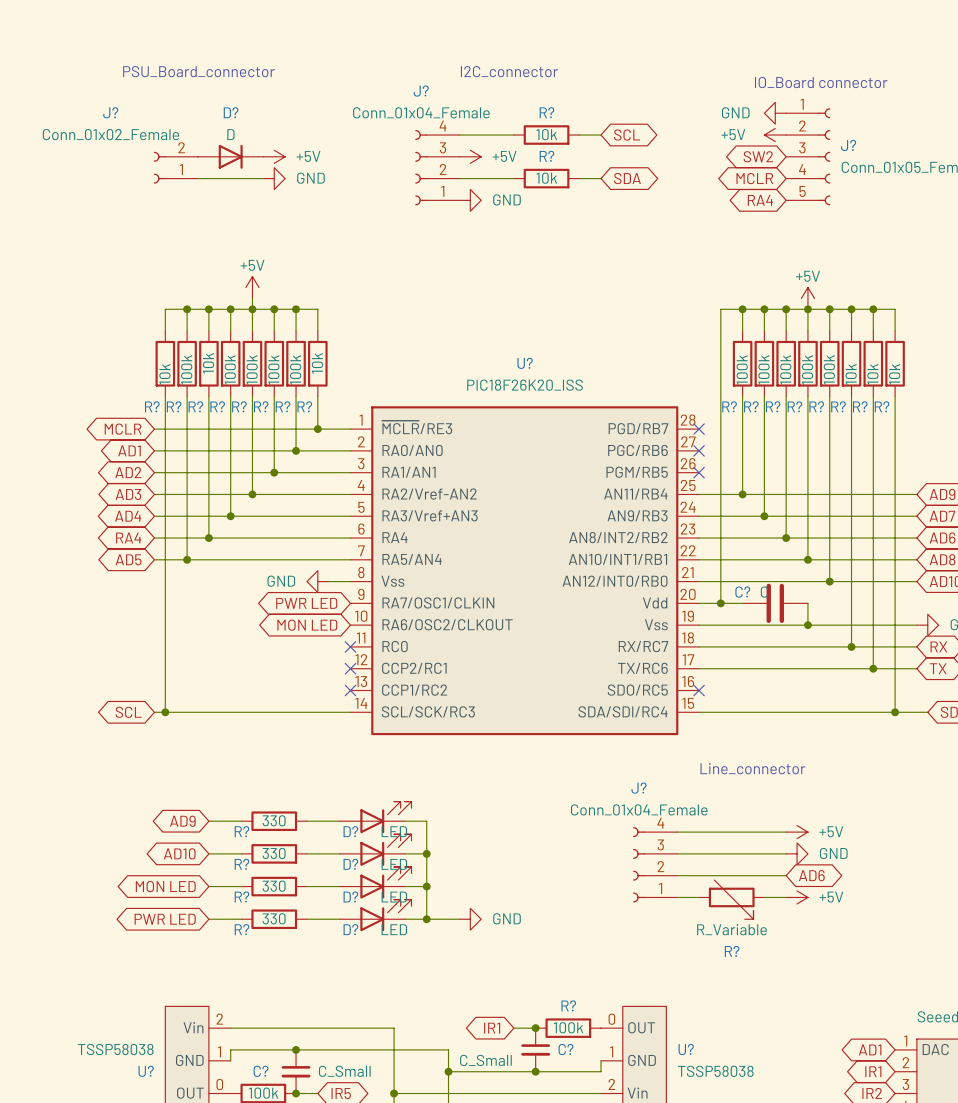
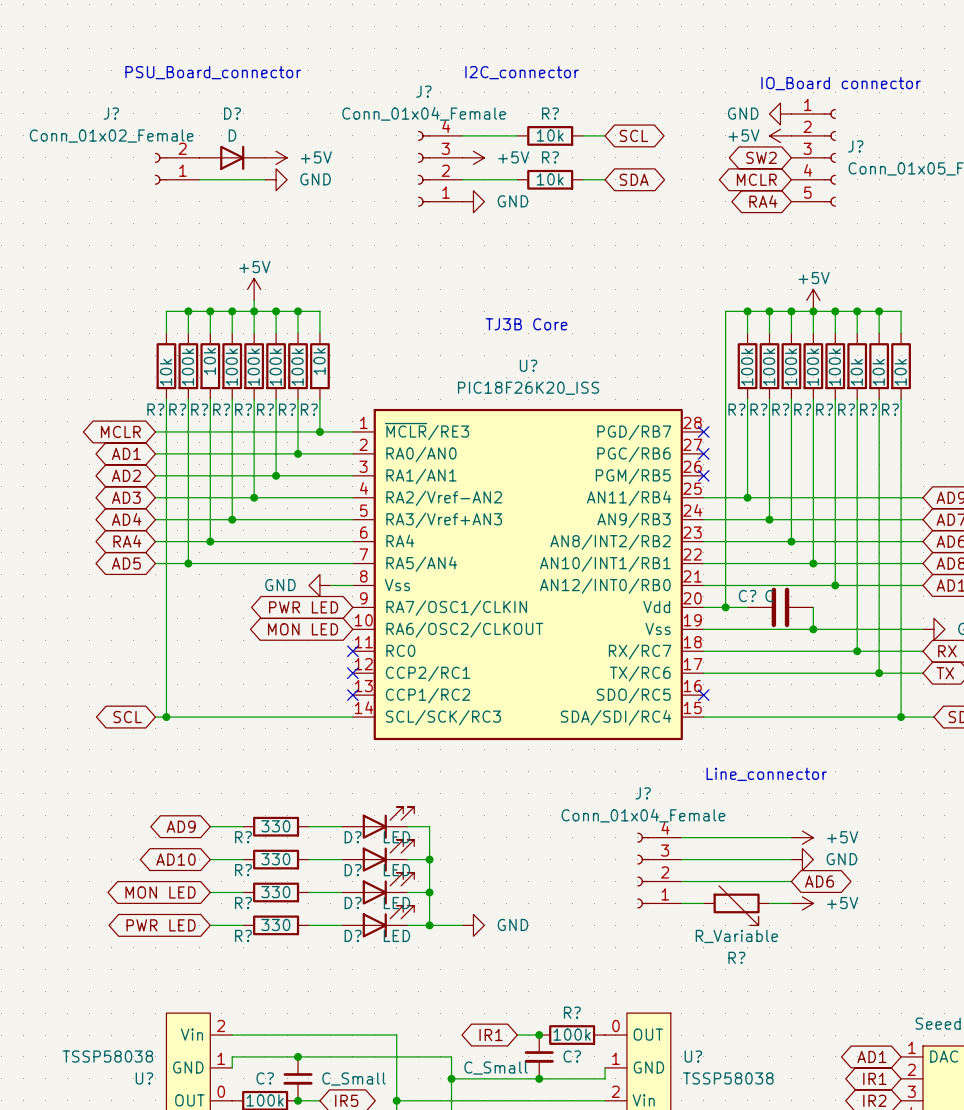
text: none -> TJ3B Core (526, 324)

